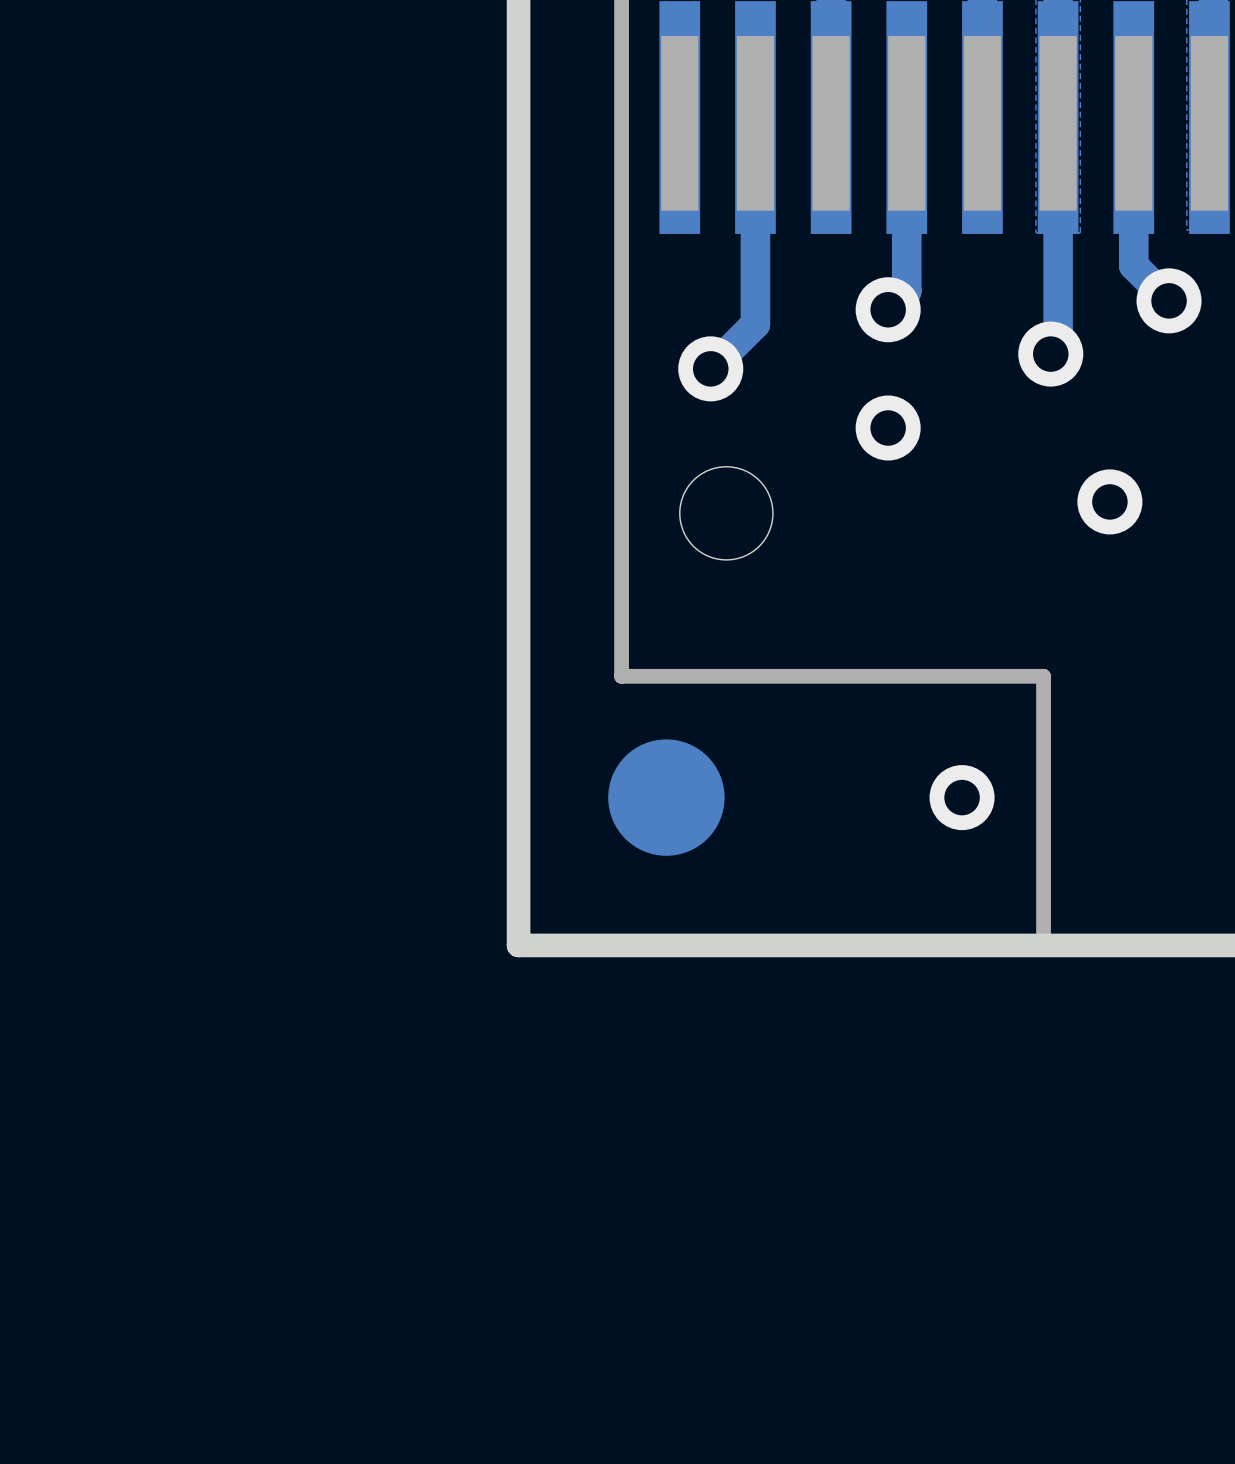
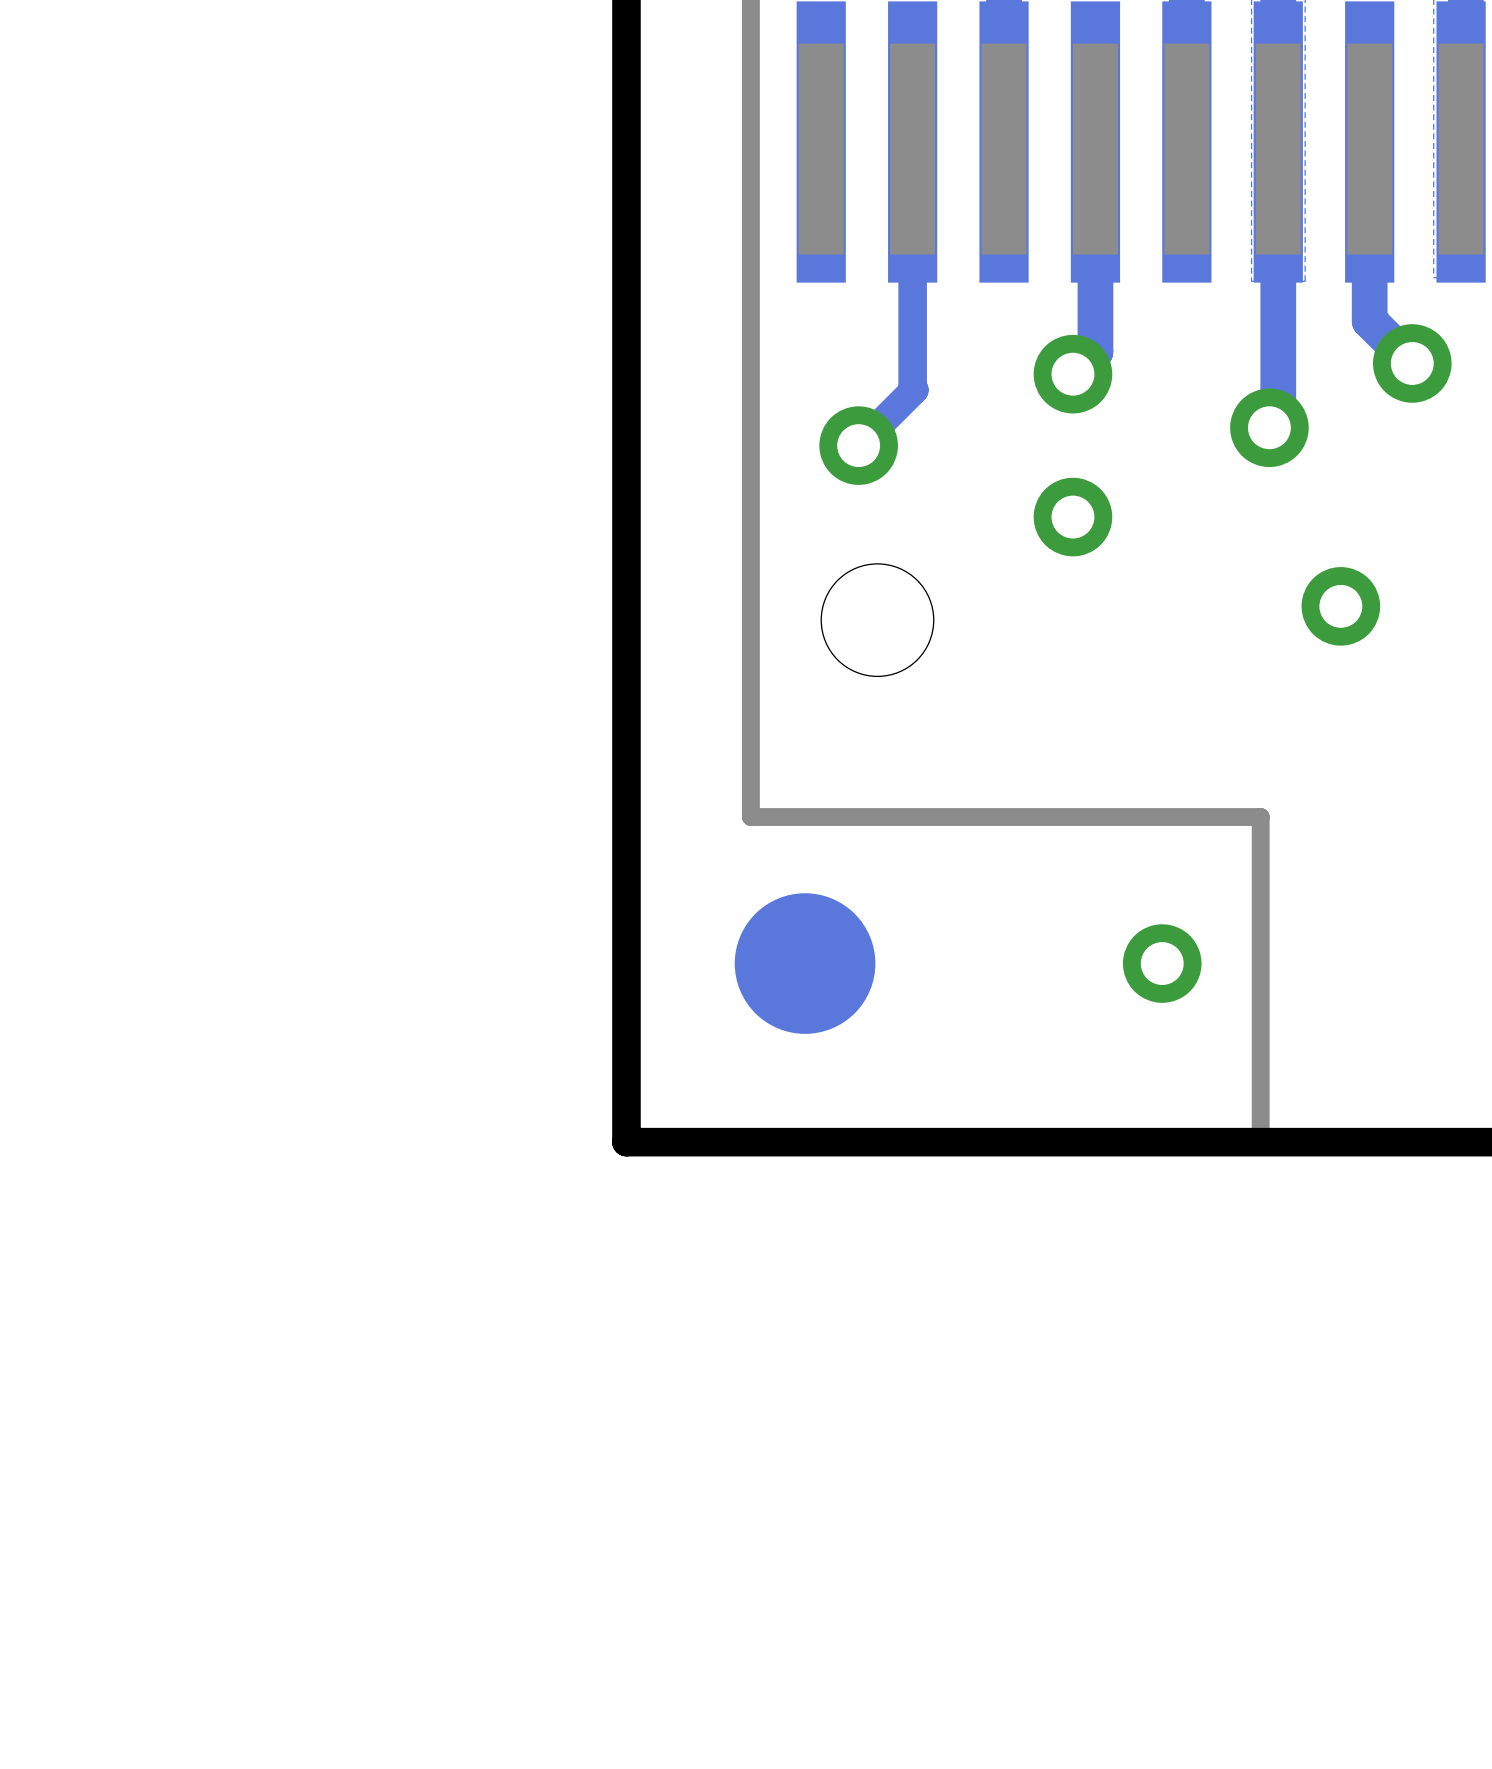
track width: thick (755, 117) (755, 324) (710, 368) -> thin (912, 142) (912, 391) (858, 445)

